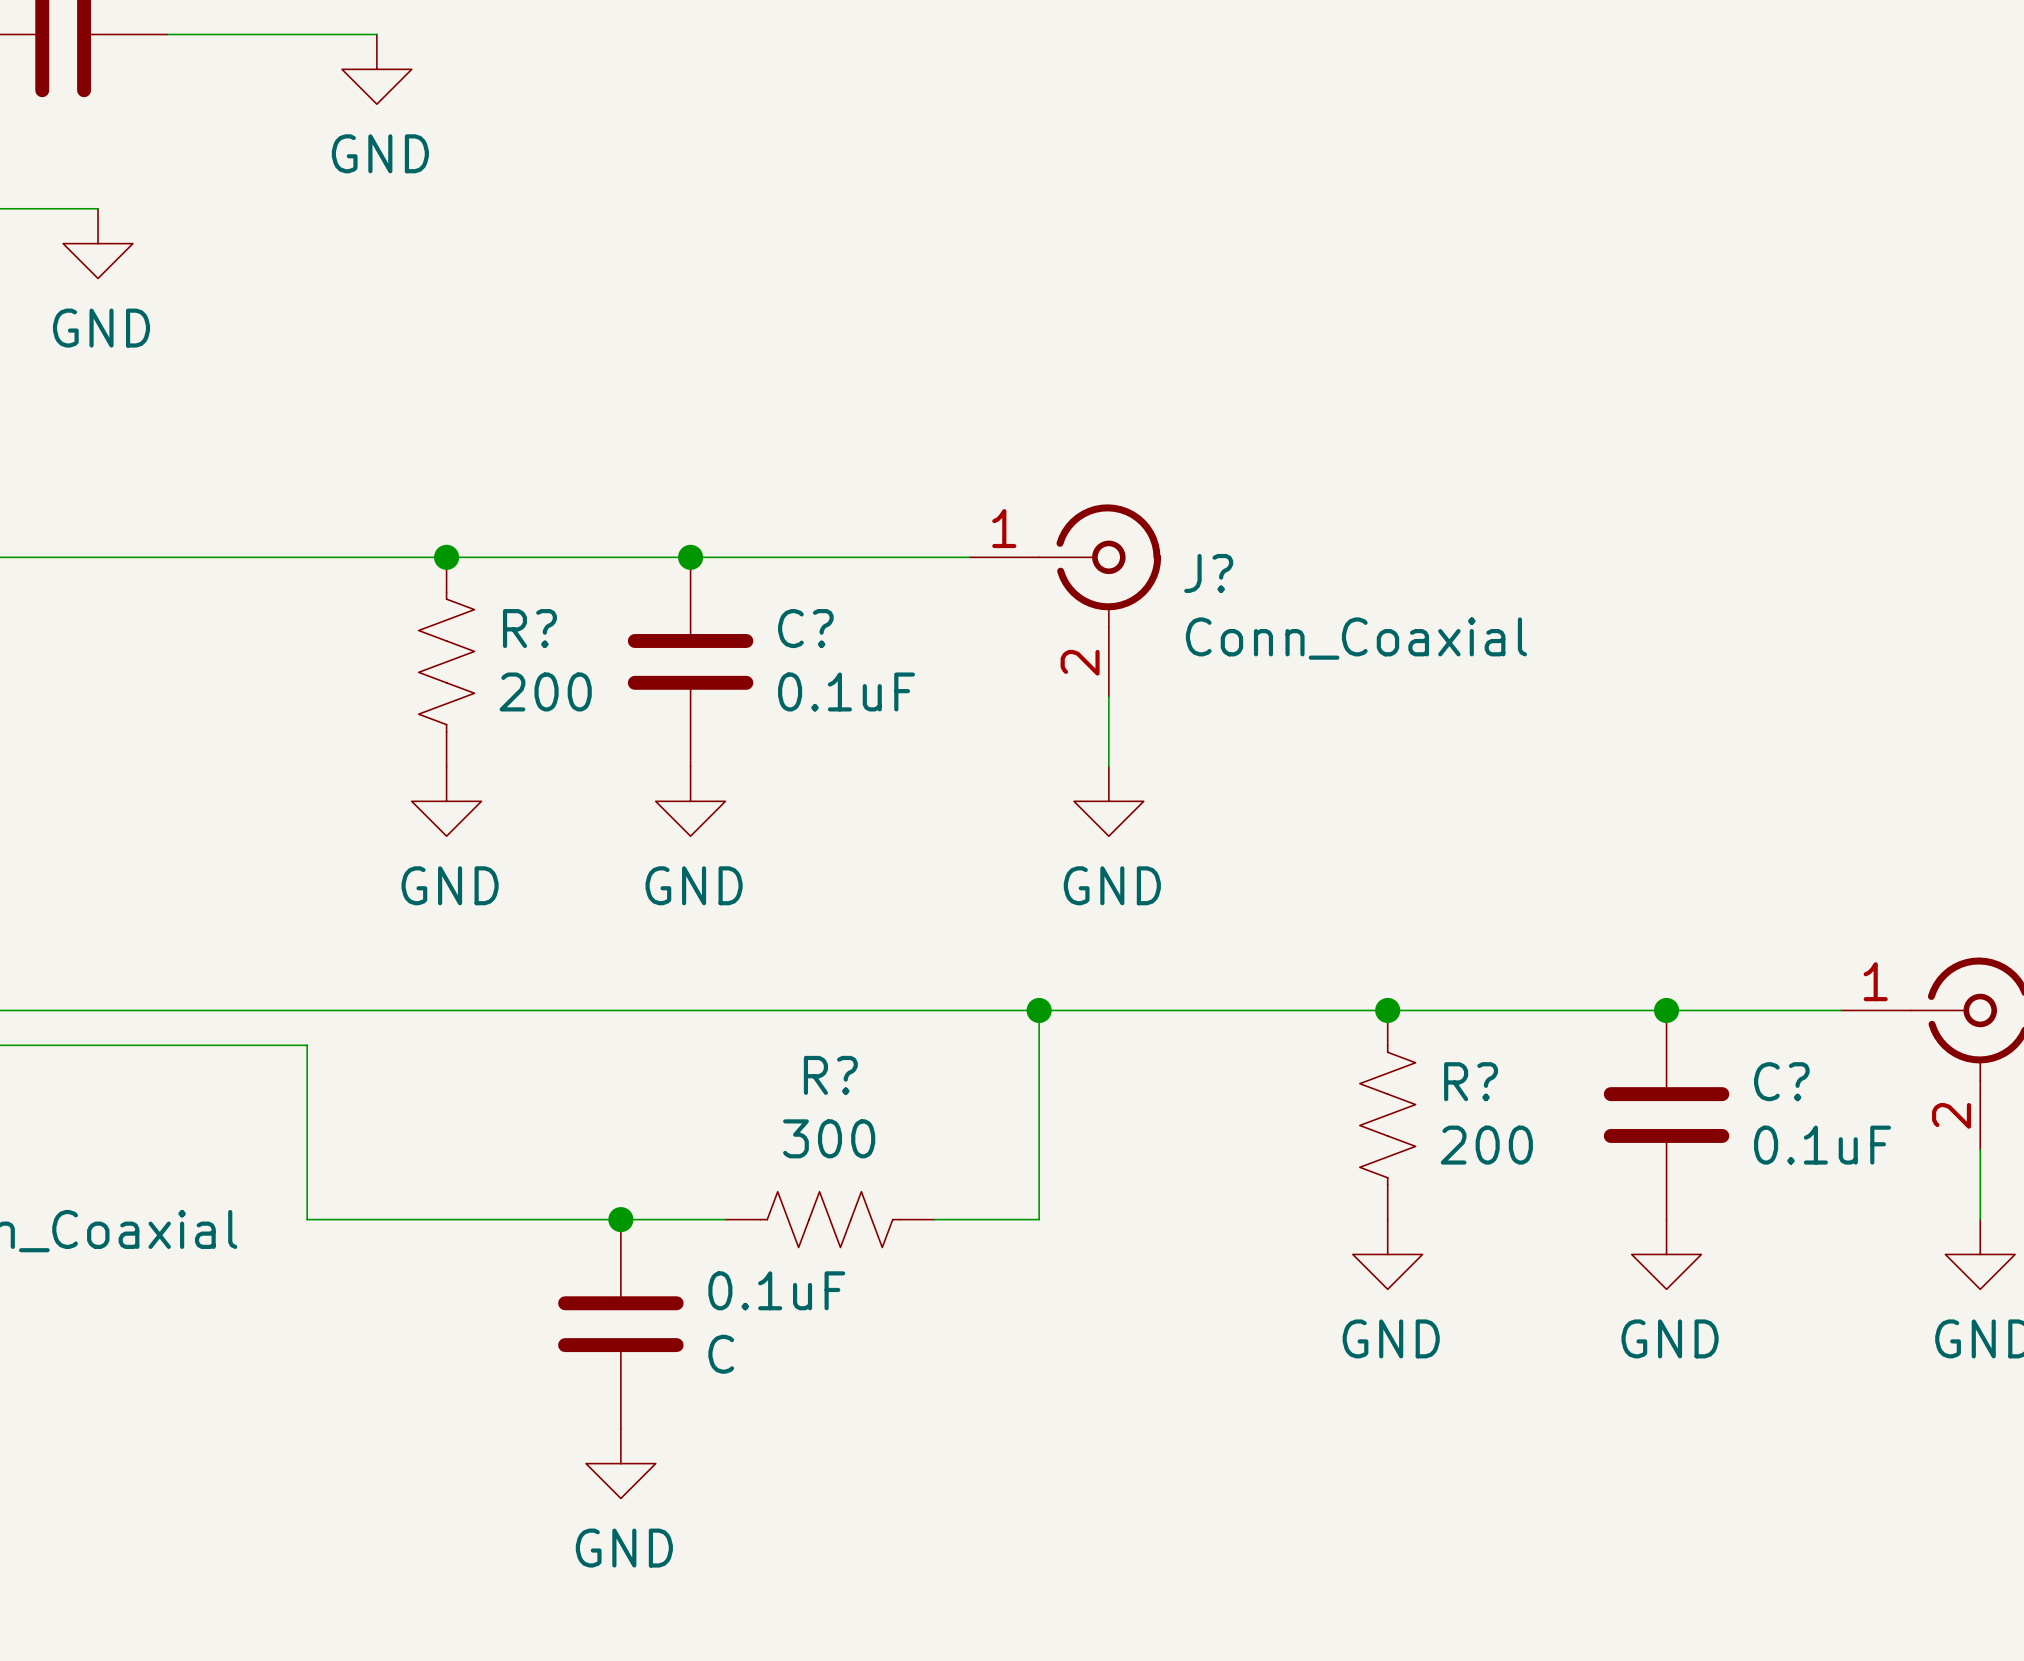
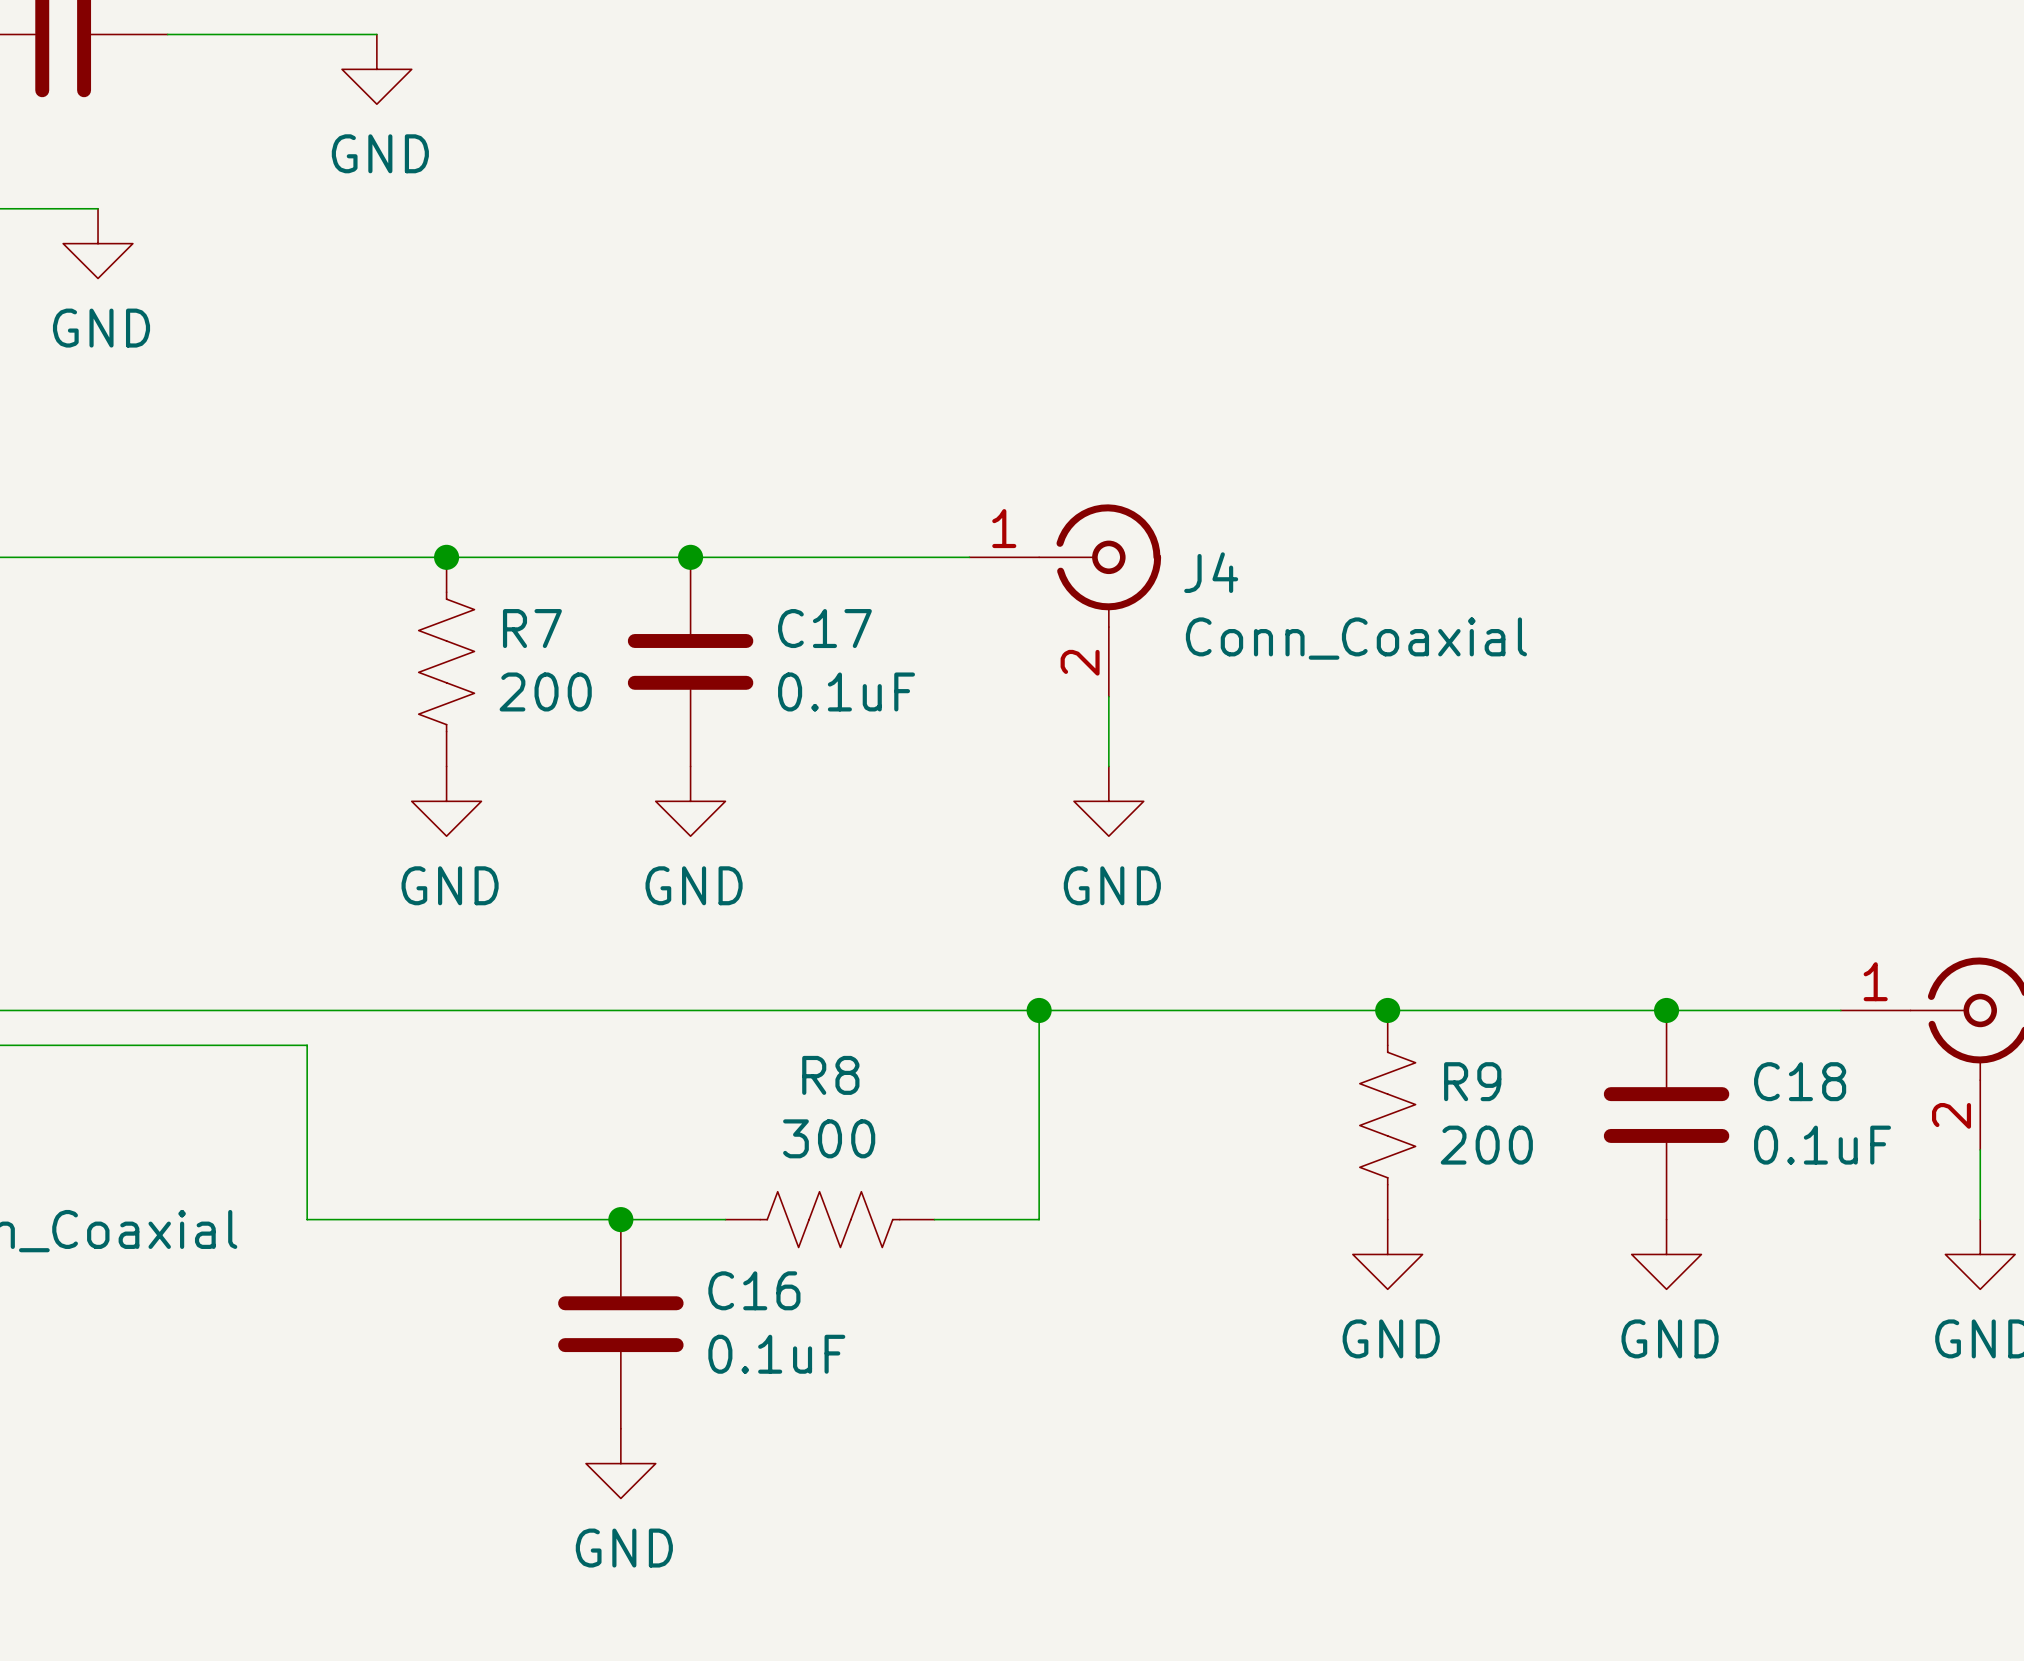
J? name: J? (1208, 573) -> J4 (1211, 572)
R? name: R? (529, 628) -> R7 (532, 628)
C? name: C? (805, 628) -> C17 (824, 628)
R? name: R? (830, 1075) -> R8 (830, 1075)
R? name: R? (1471, 1081) -> R9 (1472, 1081)
C? name: C? (1781, 1081) -> C18 (1800, 1081)
0.1uF name: 0.1uF (776, 1290) -> C16 (754, 1290)
0.1uF value: C (721, 1354) -> 0.1uF (776, 1354)

